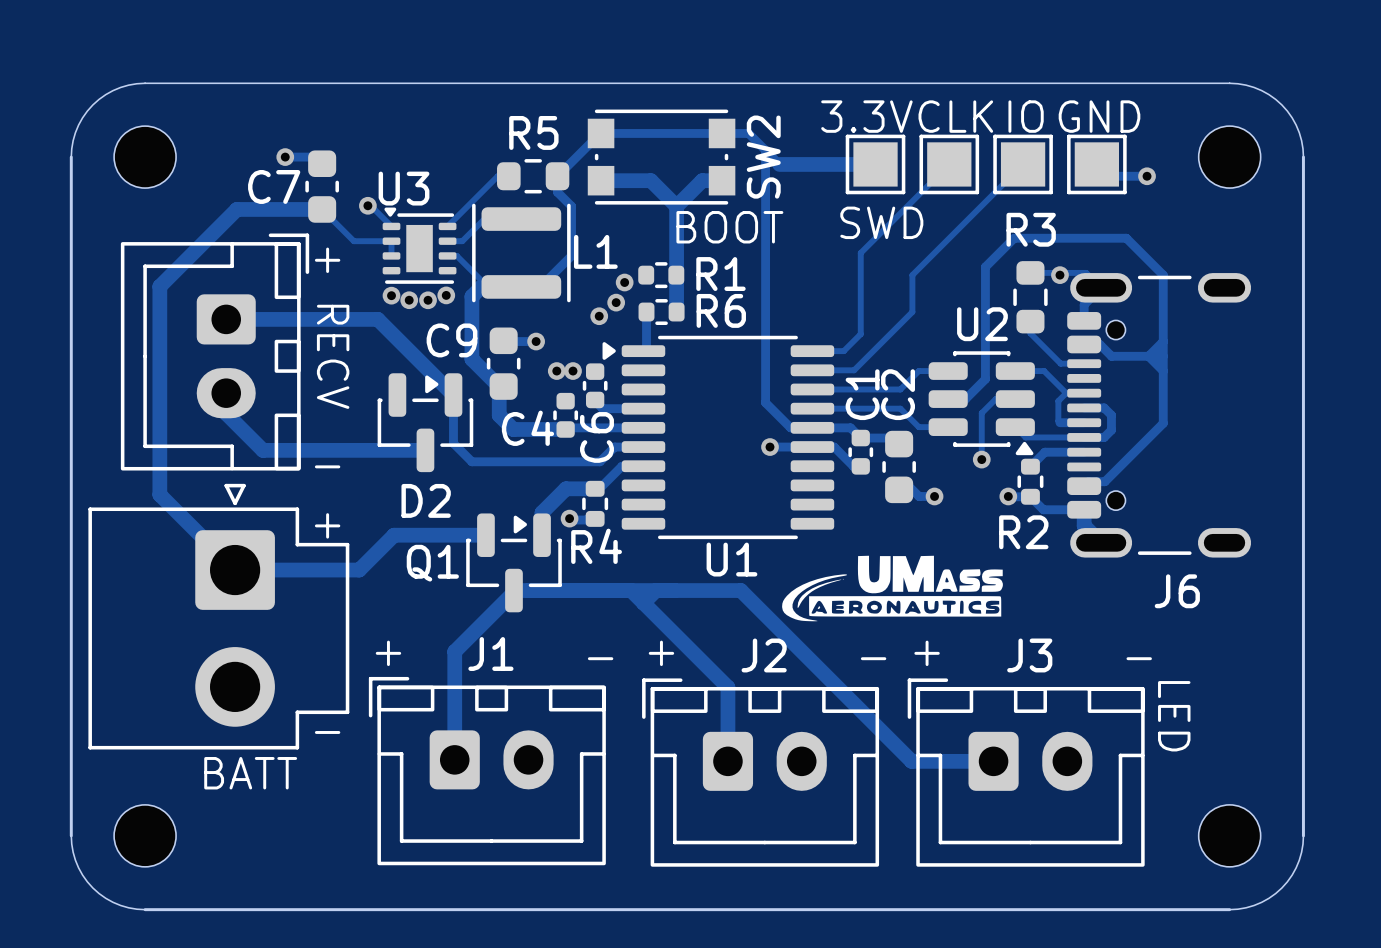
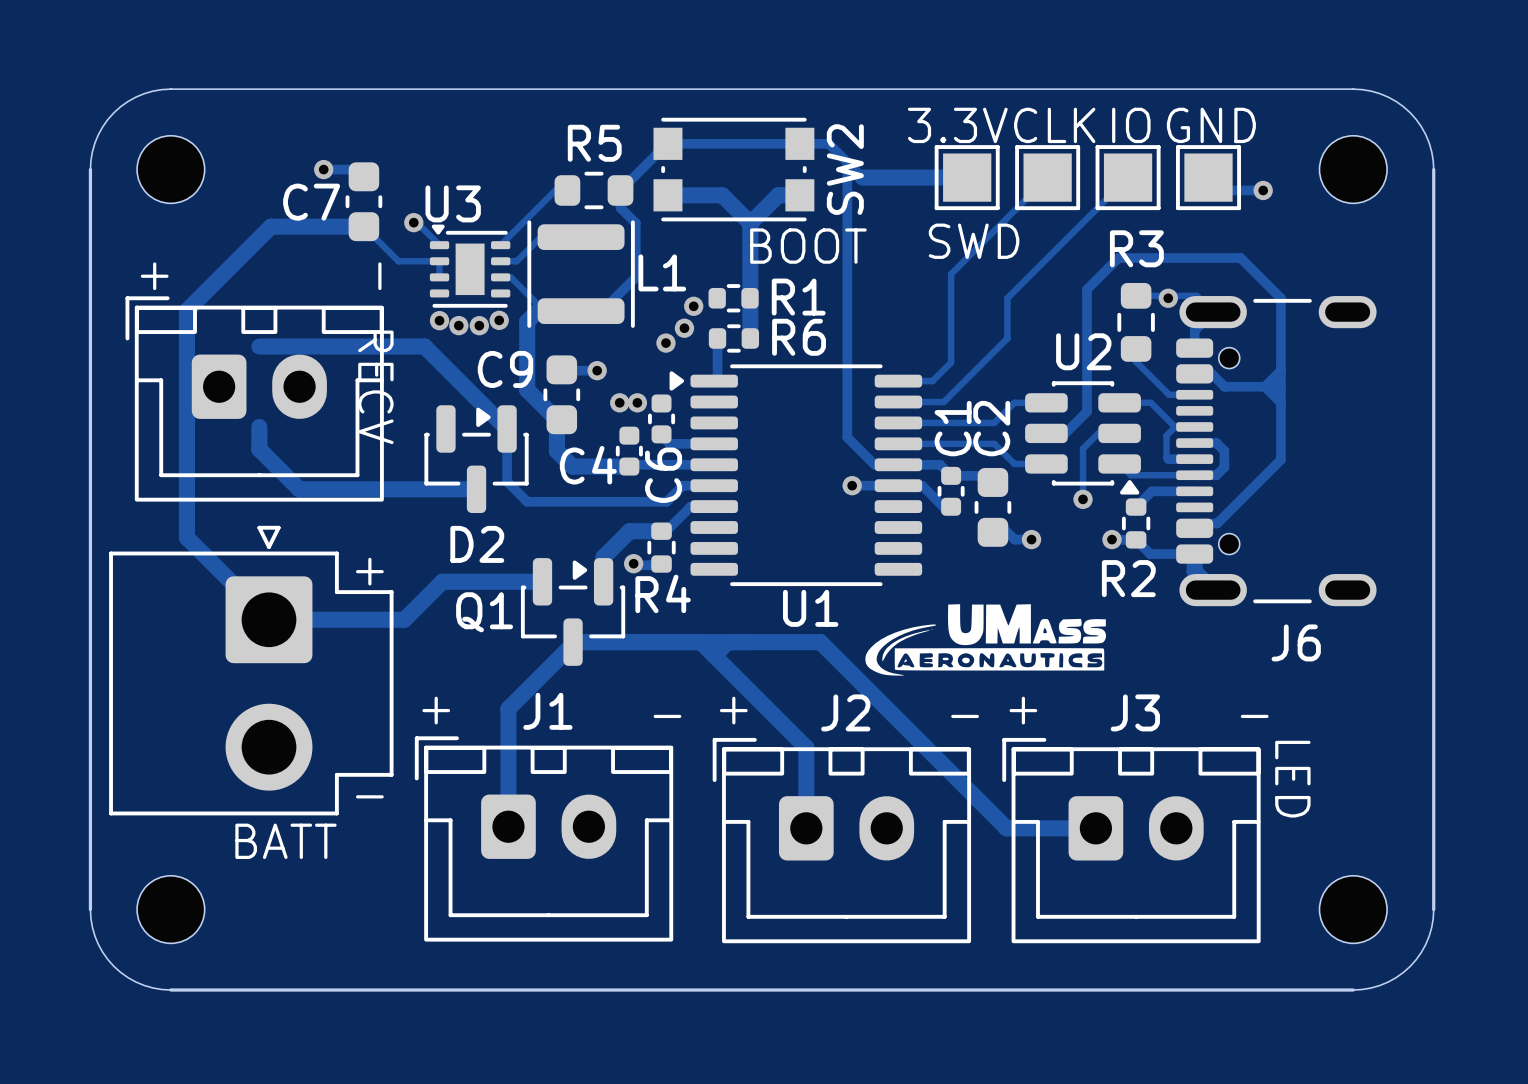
text rotation: 0° (327, 260) -> 90° counterclockwise (154, 276)
text position: + (327, 260) -> + (154, 276)
part rotation: 0° (215, 352) -> 90° counterclockwise (254, 398)
text rotation: 0° (327, 466) -> 90° counterclockwise (379, 276)
text position: - (327, 466) -> - (379, 276)

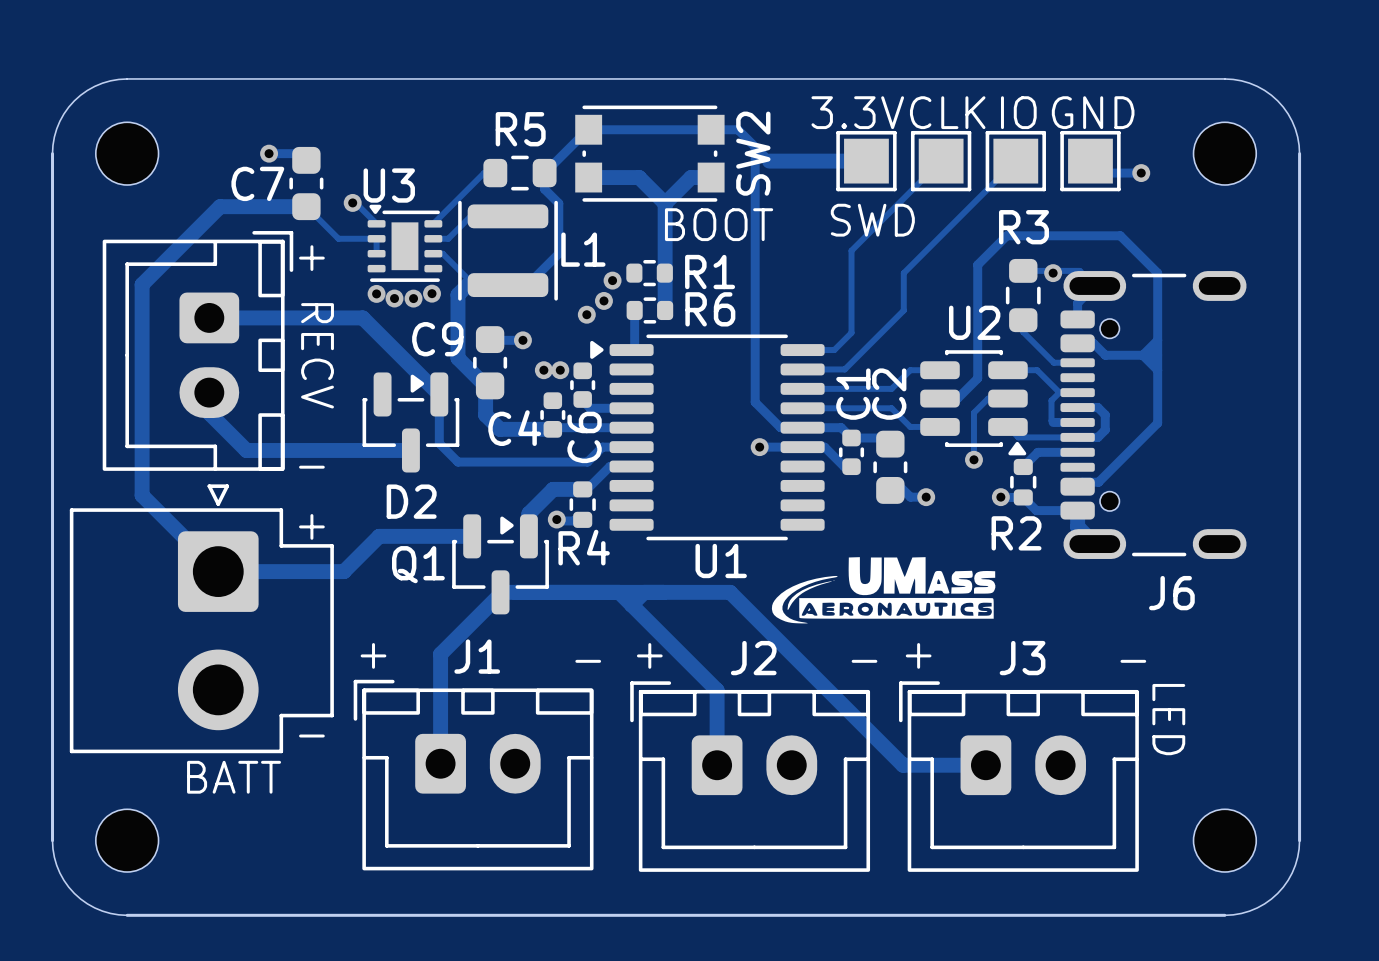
text rotation: 0° (154, 276) -> 90° clockwise (311, 258)
text position: + (154, 276) -> + (311, 258)
text rotation: 0° (379, 276) -> 90° clockwise (311, 467)
text position: - (379, 276) -> - (311, 467)
part rotation: 0° (254, 398) -> 90° clockwise (197, 350)

